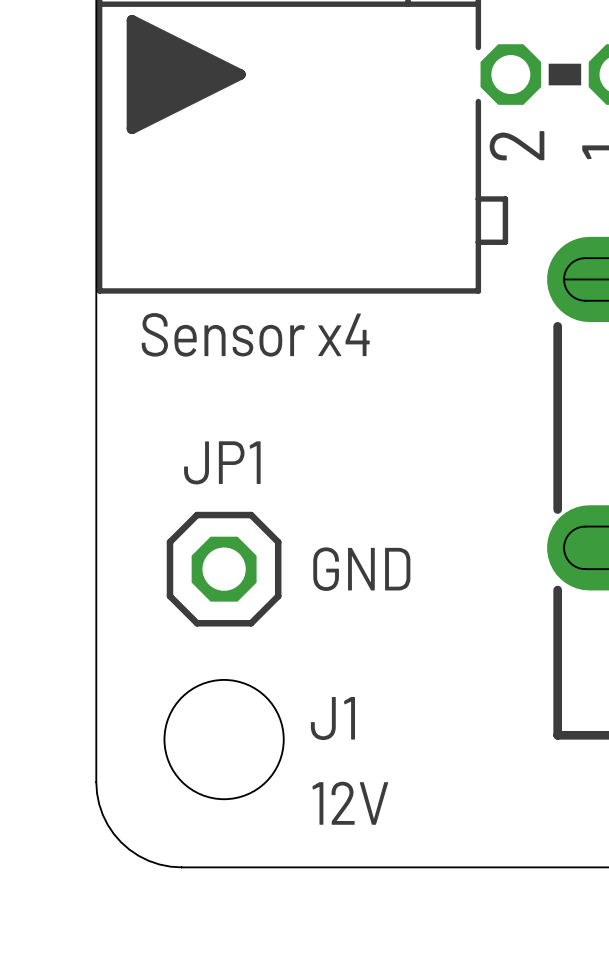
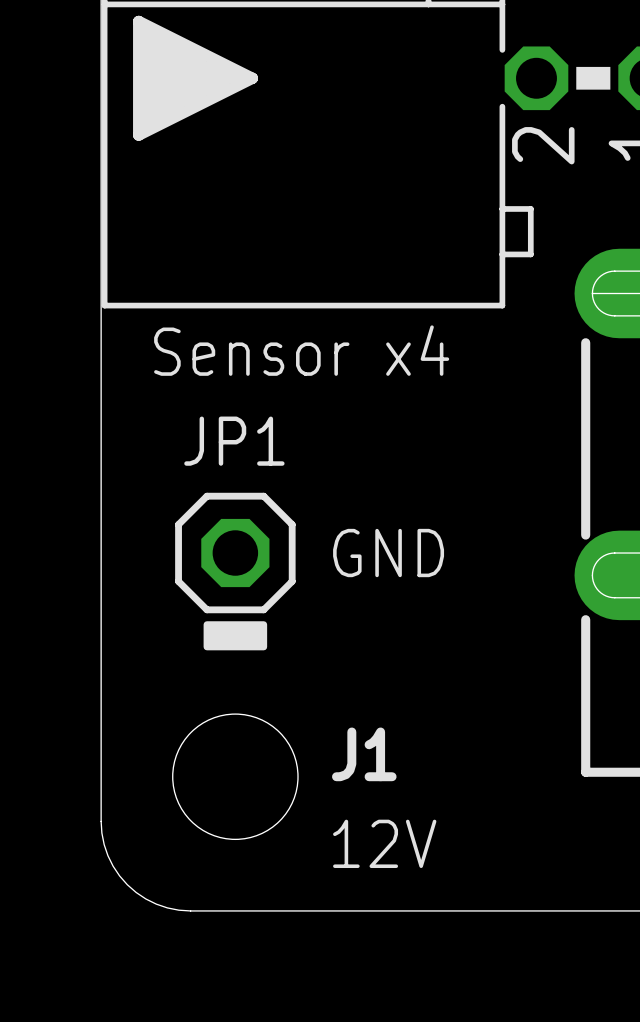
JP1 position: (224, 569) -> (235, 553)
text position: GND (361, 569) -> GND (388, 553)
drawing: none -> [203, 621, 268, 651]

